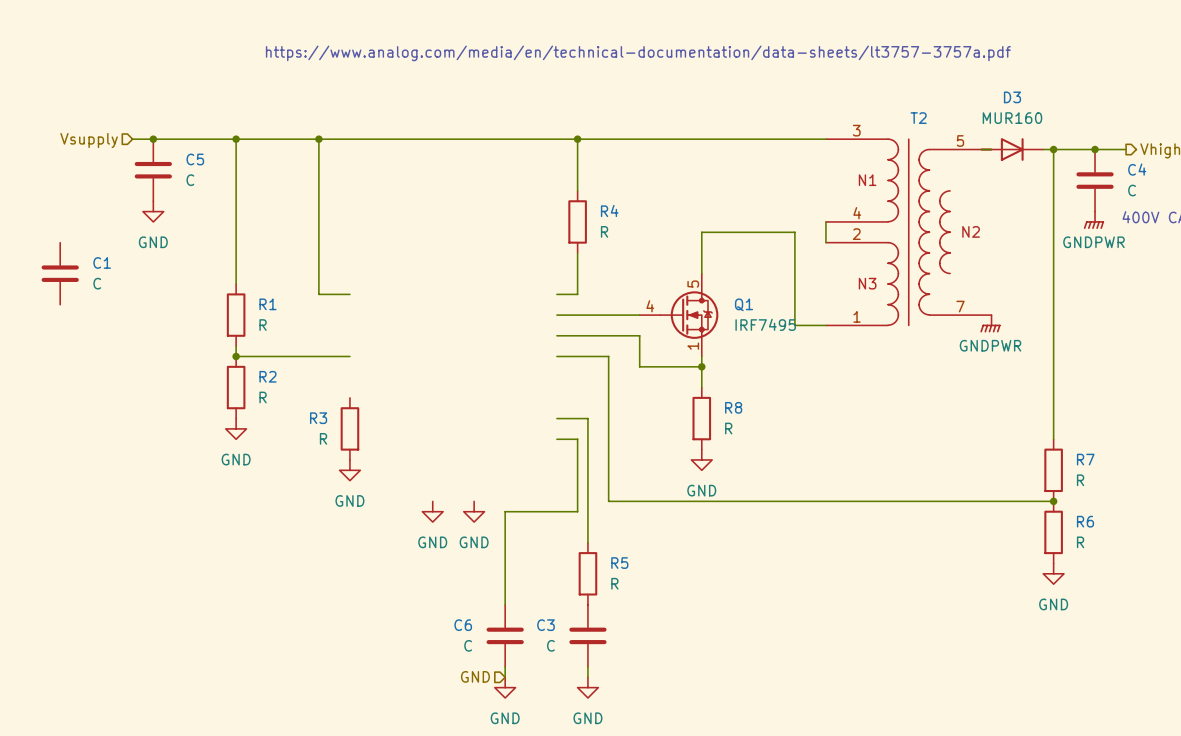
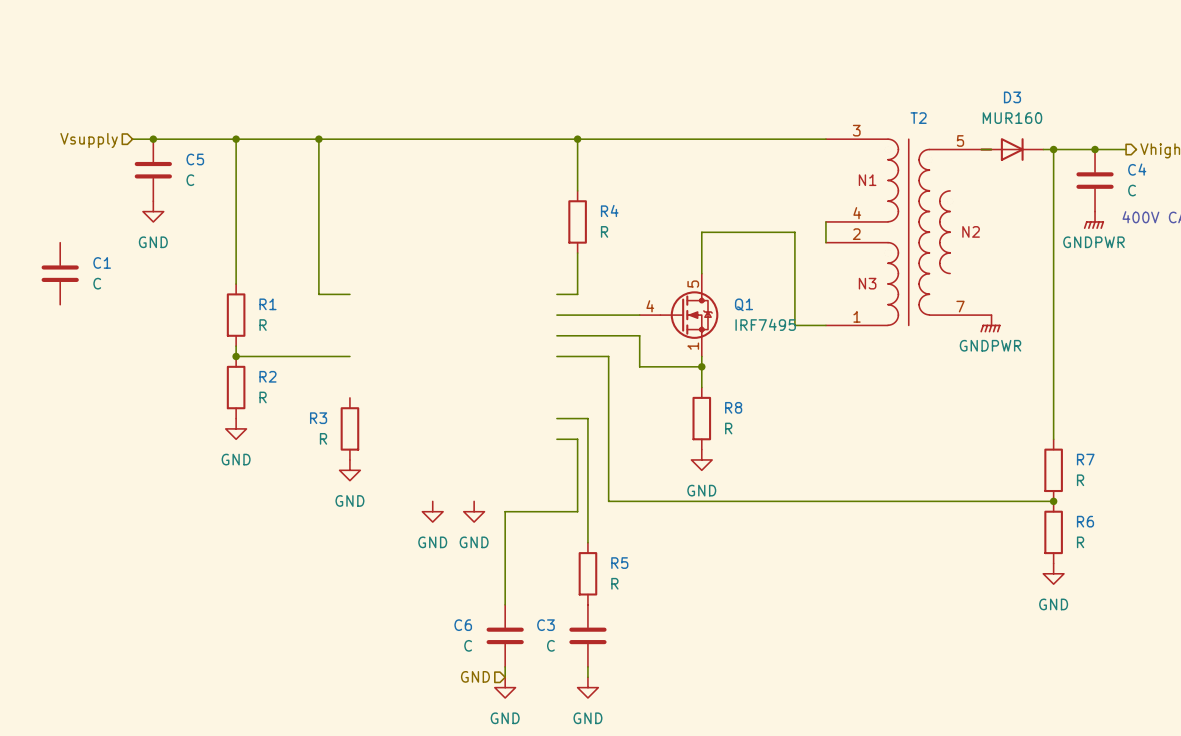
text: https://www.analog.com/media/en/technical-documentation/data-sheets/lt3757-3757a.pdf (638, 53) -> none

